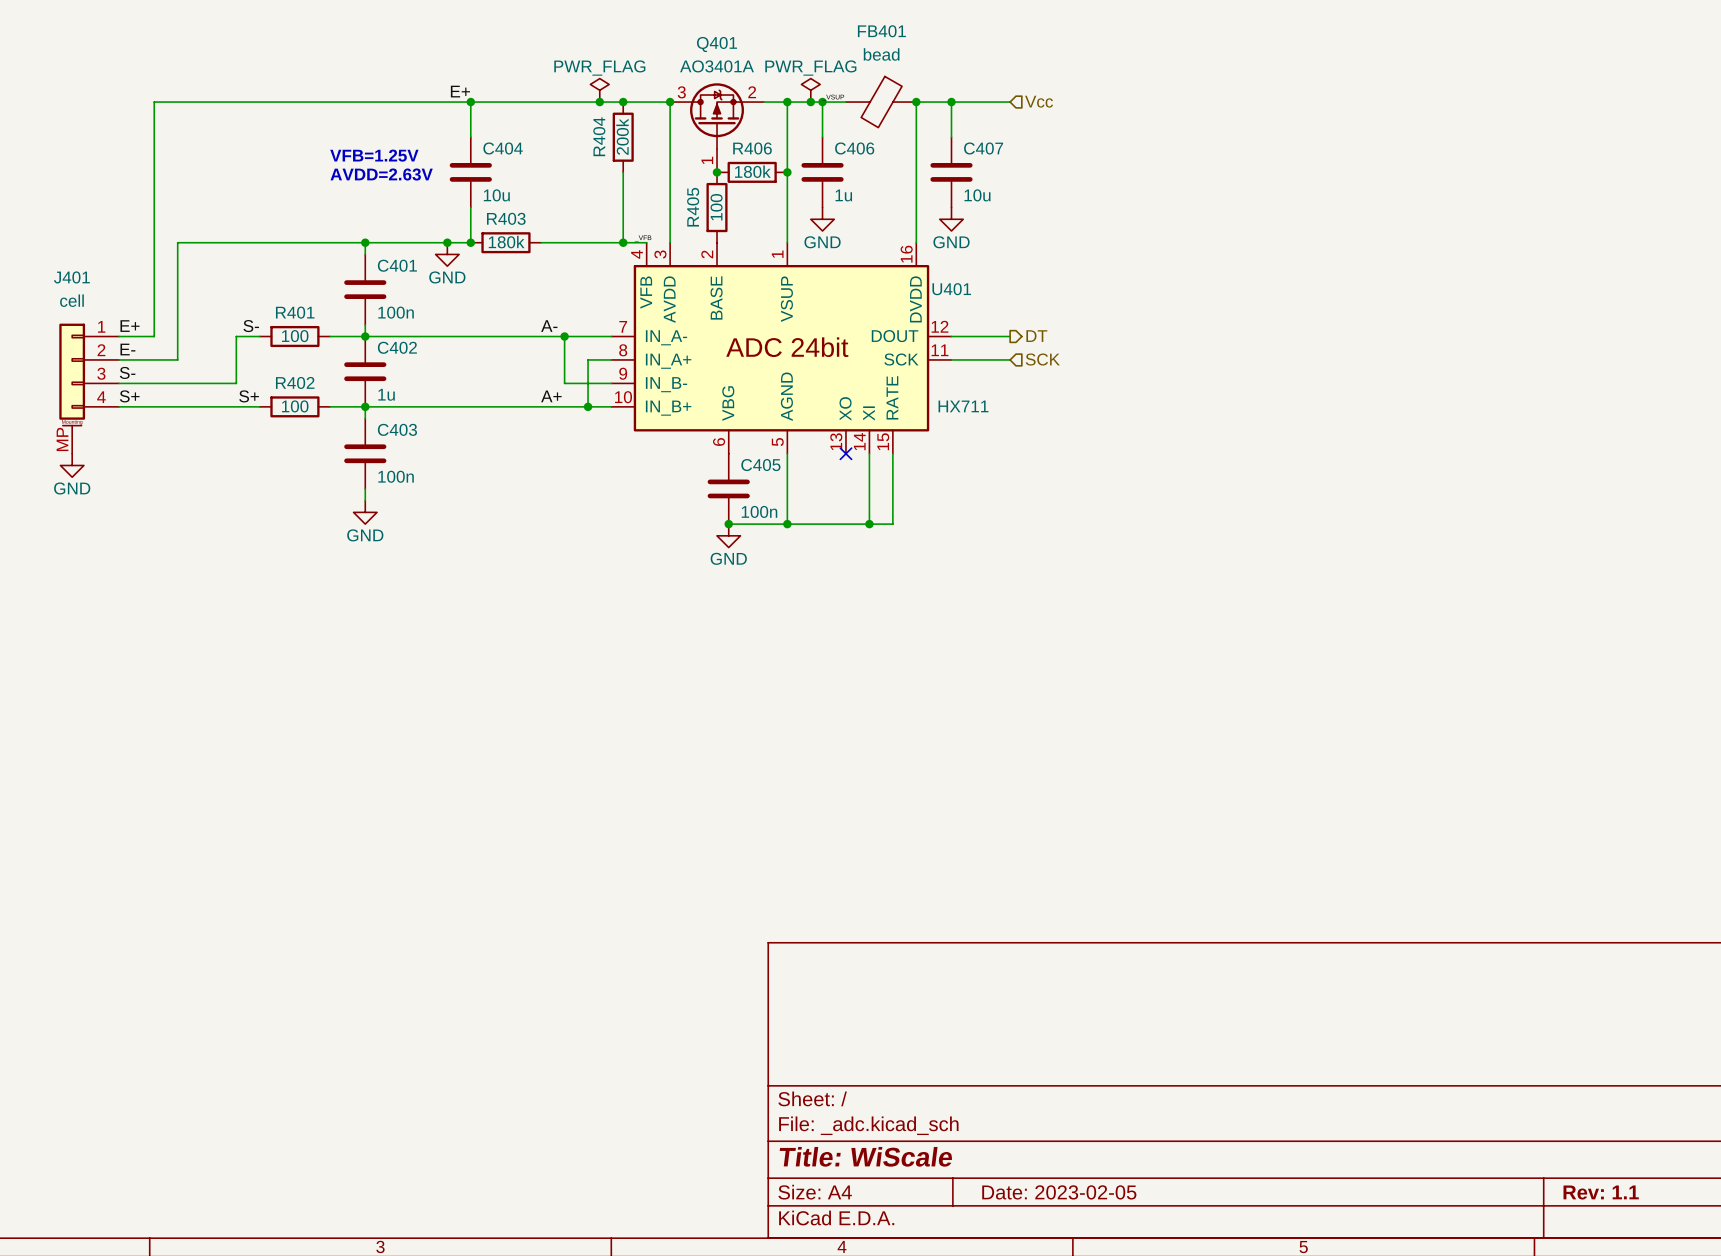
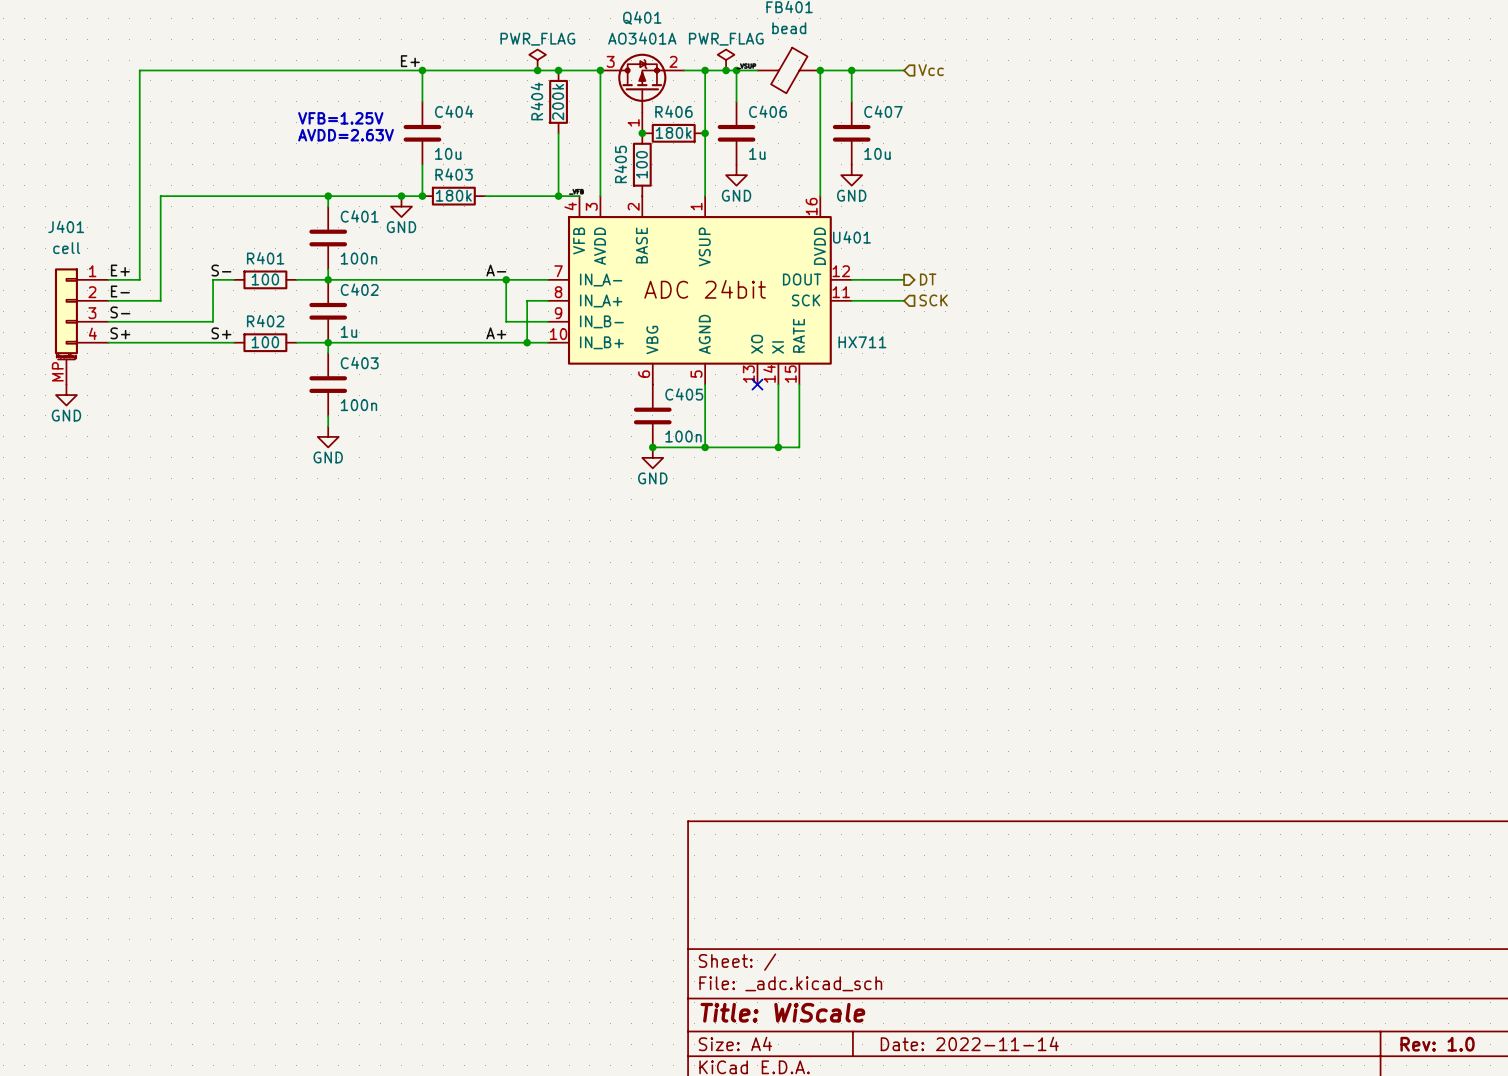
title block: Date: 2023-02-05 (1059, 1192) -> Date: 2022-11-14 (969, 1043)
title block: Rev: 1.1 (1601, 1192) -> Rev: 1.0 (1437, 1044)

